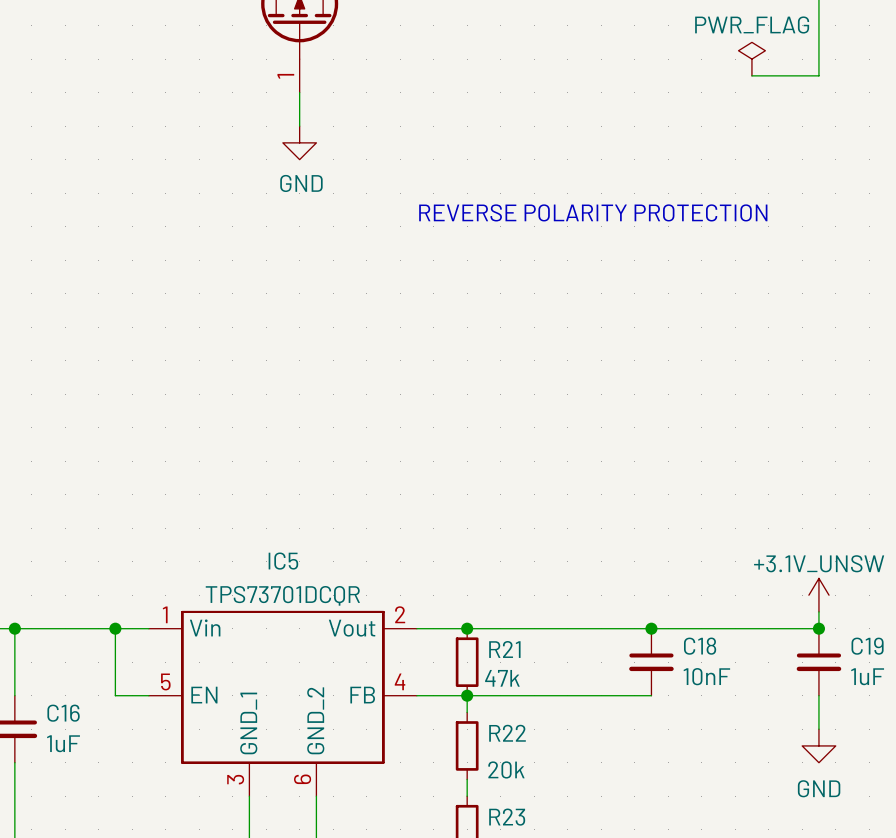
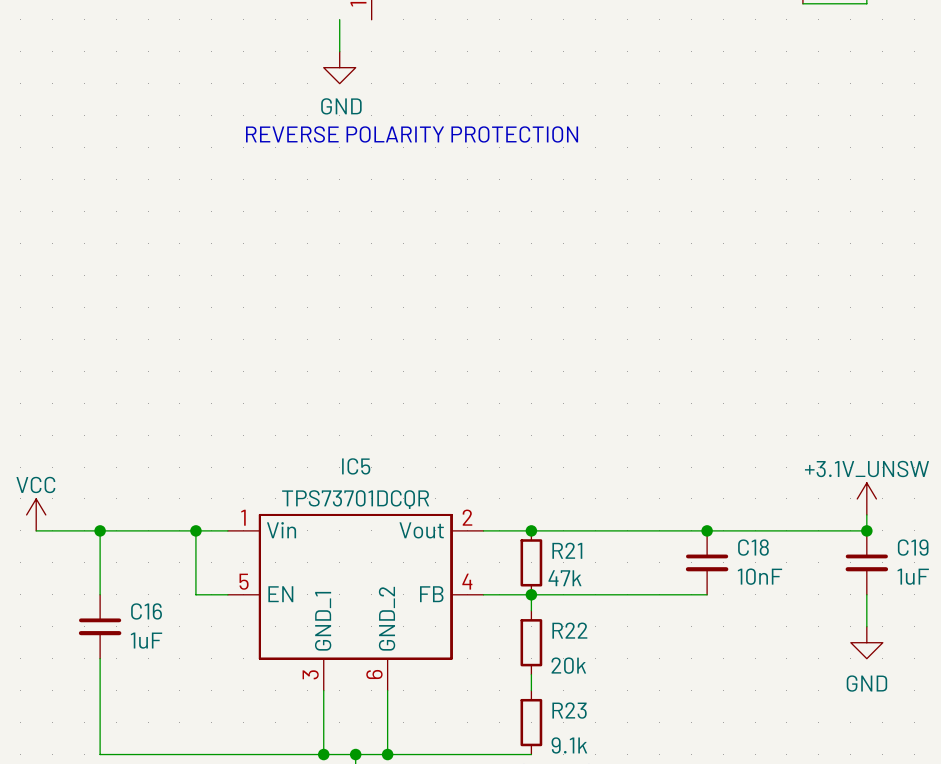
wire: (299, 92) (299, 126) -> (339, 19) (339, 51)
power symbol position: GND (299, 142) -> GND (339, 67)
text position: REVERSE POLARITY PROTECTION (593, 212) -> REVERSE POLARITY PROTECTION (412, 134)

